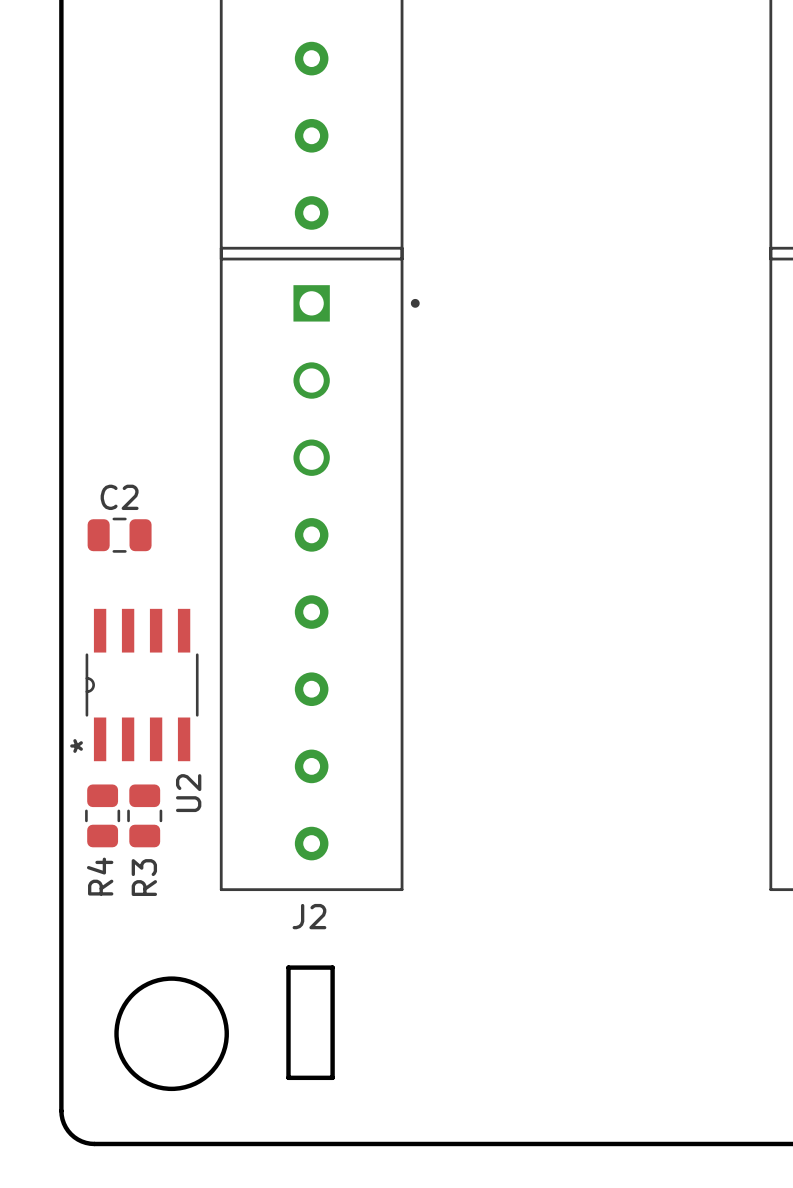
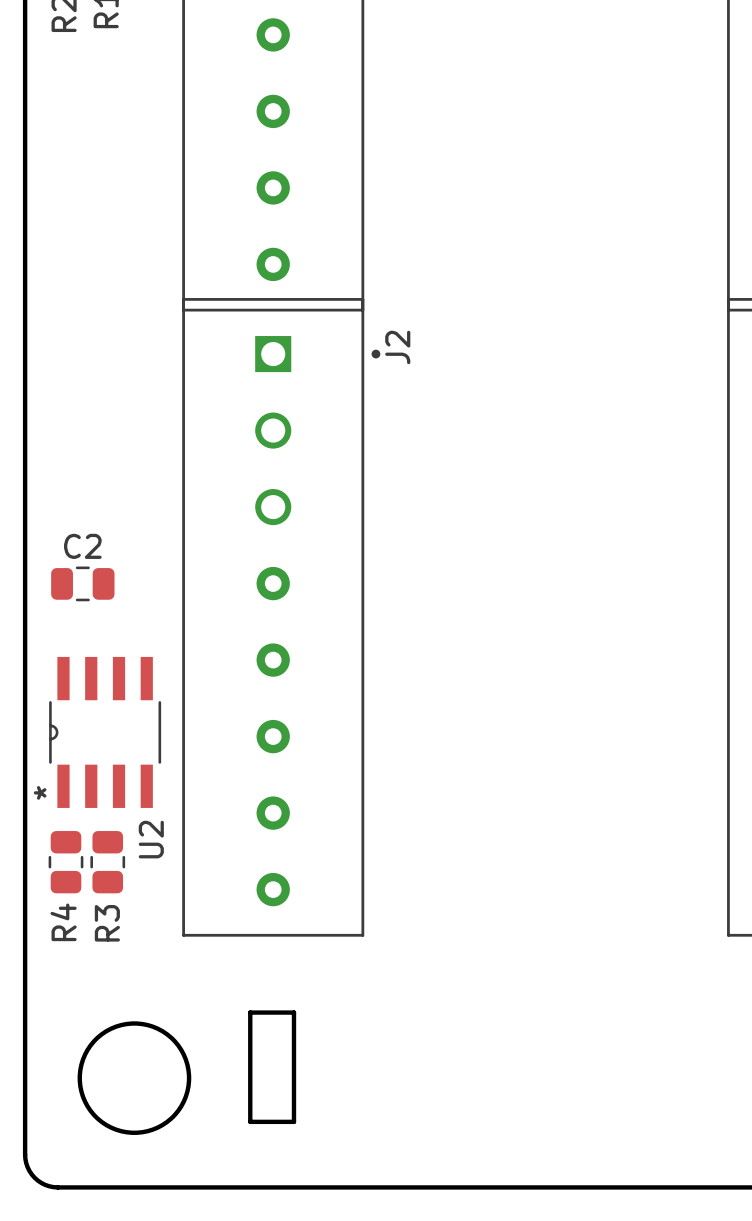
J2 name rotation: 0° (309, 916) -> 90° counterclockwise (397, 347)
J2 name position: J2 (309, 916) -> J2 (397, 347)

